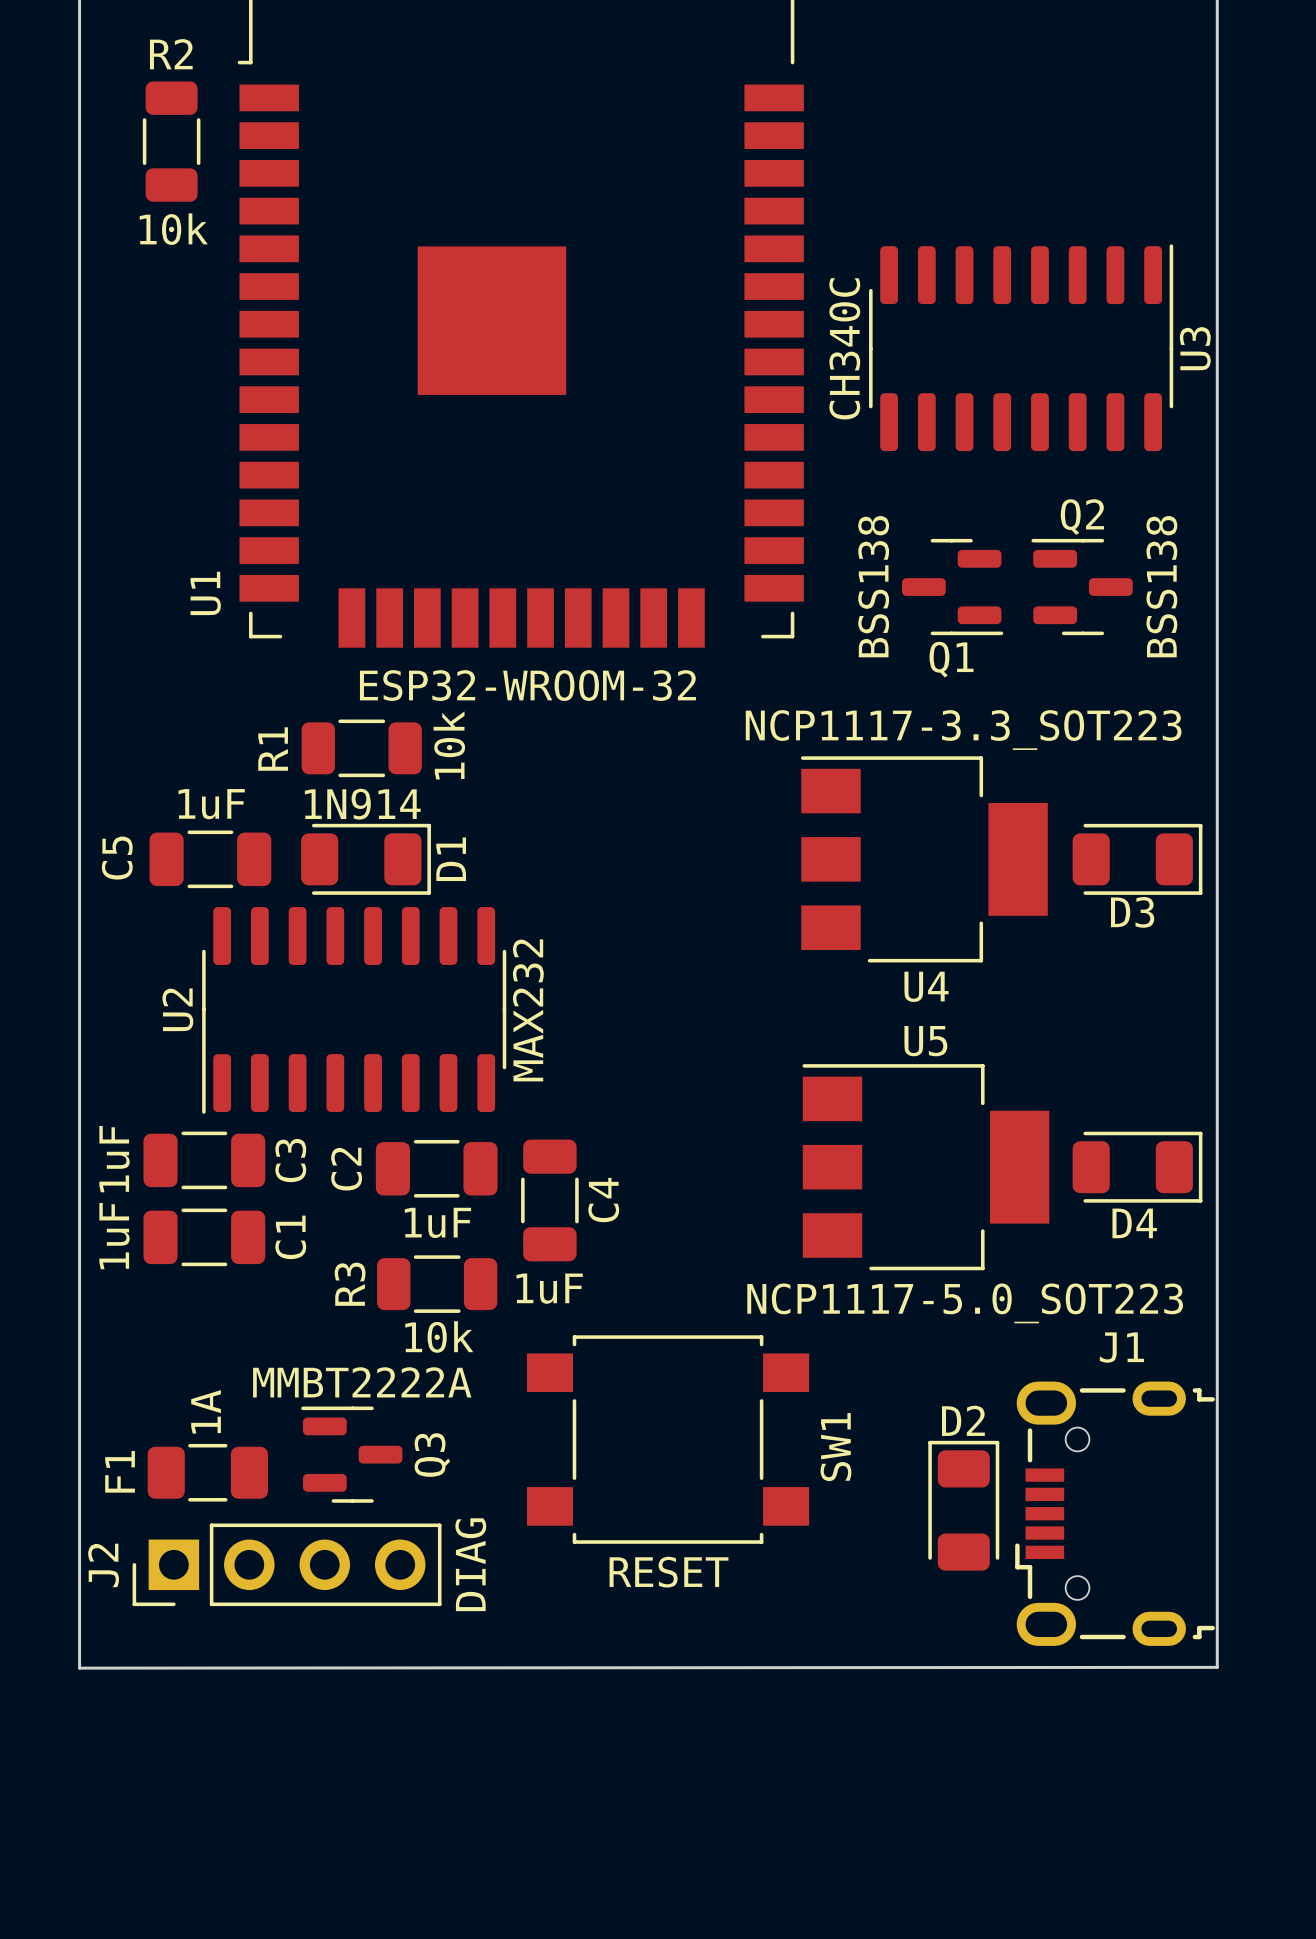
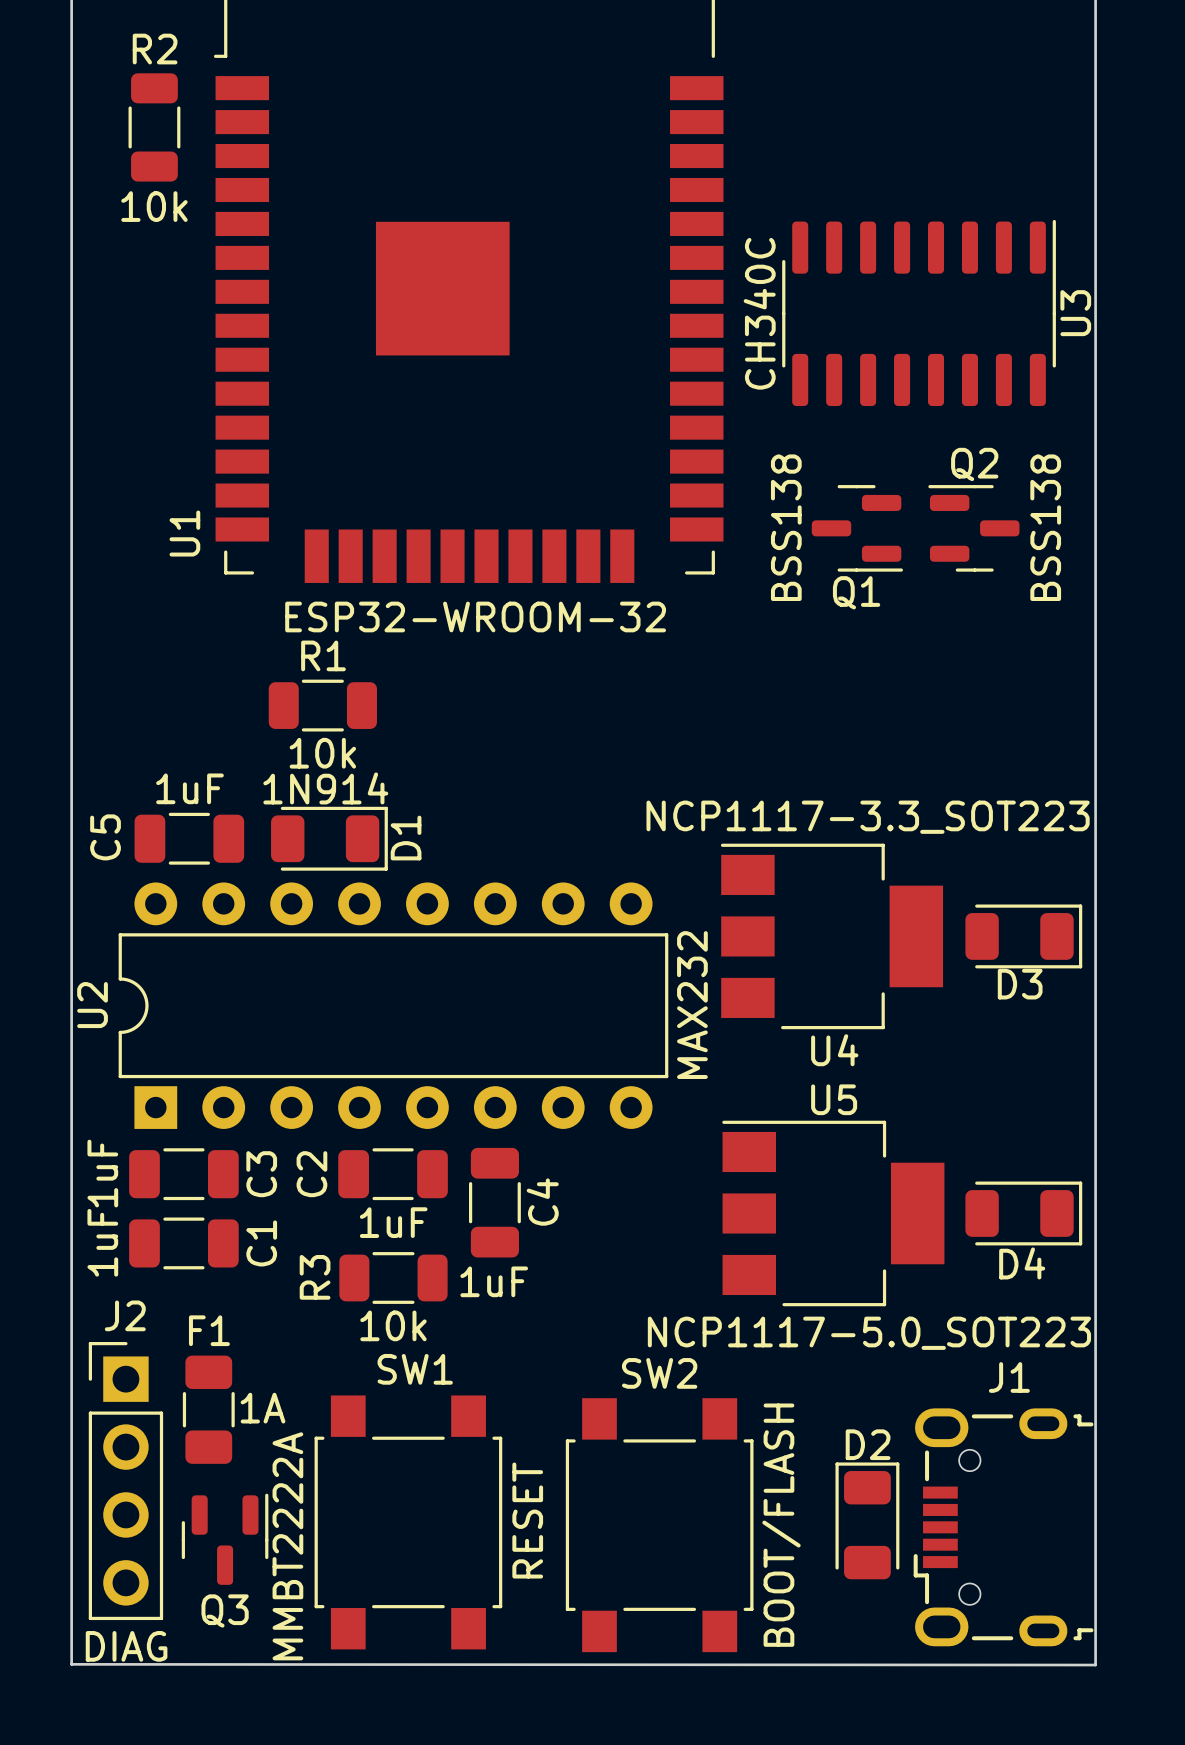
R1 value rotation: 0° (449, 745) -> 90° clockwise (322, 753)
R1 value position: 10k (449, 745) -> 10k (322, 753)
R1 position: (361, 748) -> (322, 705)
R1 name rotation: 0° (273, 749) -> 90° clockwise (323, 655)
R1 name position: R1 (273, 749) -> R1 (323, 655)
C5 position: (210, 859) -> (189, 838)
D1 position: (366, 859) -> (329, 838)
U4 position: (924, 859) -> (831, 936)
D3 position: (1137, 859) -> (1023, 936)
U2 footprint: [202, 907, 507, 1114] -> [118, 882, 669, 1129]
U2 name position: U2 (177, 1009) -> U2 (92, 1005)
U2 value position: MAX232 (528, 1010) -> MAX232 (692, 1005)
C3 position: (204, 1160) -> (183, 1174)
U5 position: (925, 1167) -> (833, 1213)
D4 position: (1137, 1167) -> (1023, 1213)
C2 position: (436, 1168) -> (393, 1174)
C4 position: (549, 1200) -> (494, 1202)
C1 position: (204, 1237) -> (183, 1243)
R3 position: (437, 1284) -> (393, 1277)
SW1 rotation: 0° (668, 1439) -> 90° clockwise (408, 1522)
SW1 position: (668, 1439) -> (408, 1522)
SW1 name position: SW1 (835, 1447) -> SW1 (415, 1369)
Q3 rotation: 0° (351, 1454) -> 90° clockwise (225, 1539)
Q3 position: (351, 1454) -> (225, 1539)
F1 rotation: 0° (207, 1472) -> 90° clockwise (208, 1409)
F1 position: (207, 1472) -> (208, 1409)
D2 position: (963, 1505) -> (867, 1520)
J1 position: (1115, 1513) -> (1003, 1527)
J2 rotation: 0° (287, 1564) -> 90° clockwise (125, 1481)
SW1 value position: RESET (668, 1572) -> RESET (527, 1520)
board edge: (1217, 1667) (79, 1668) -> (1095, 1500) (1095, 1665) (71, 1664) (71, 1501)
SW2: none -> BOOT/FLASH (659, 1525)

